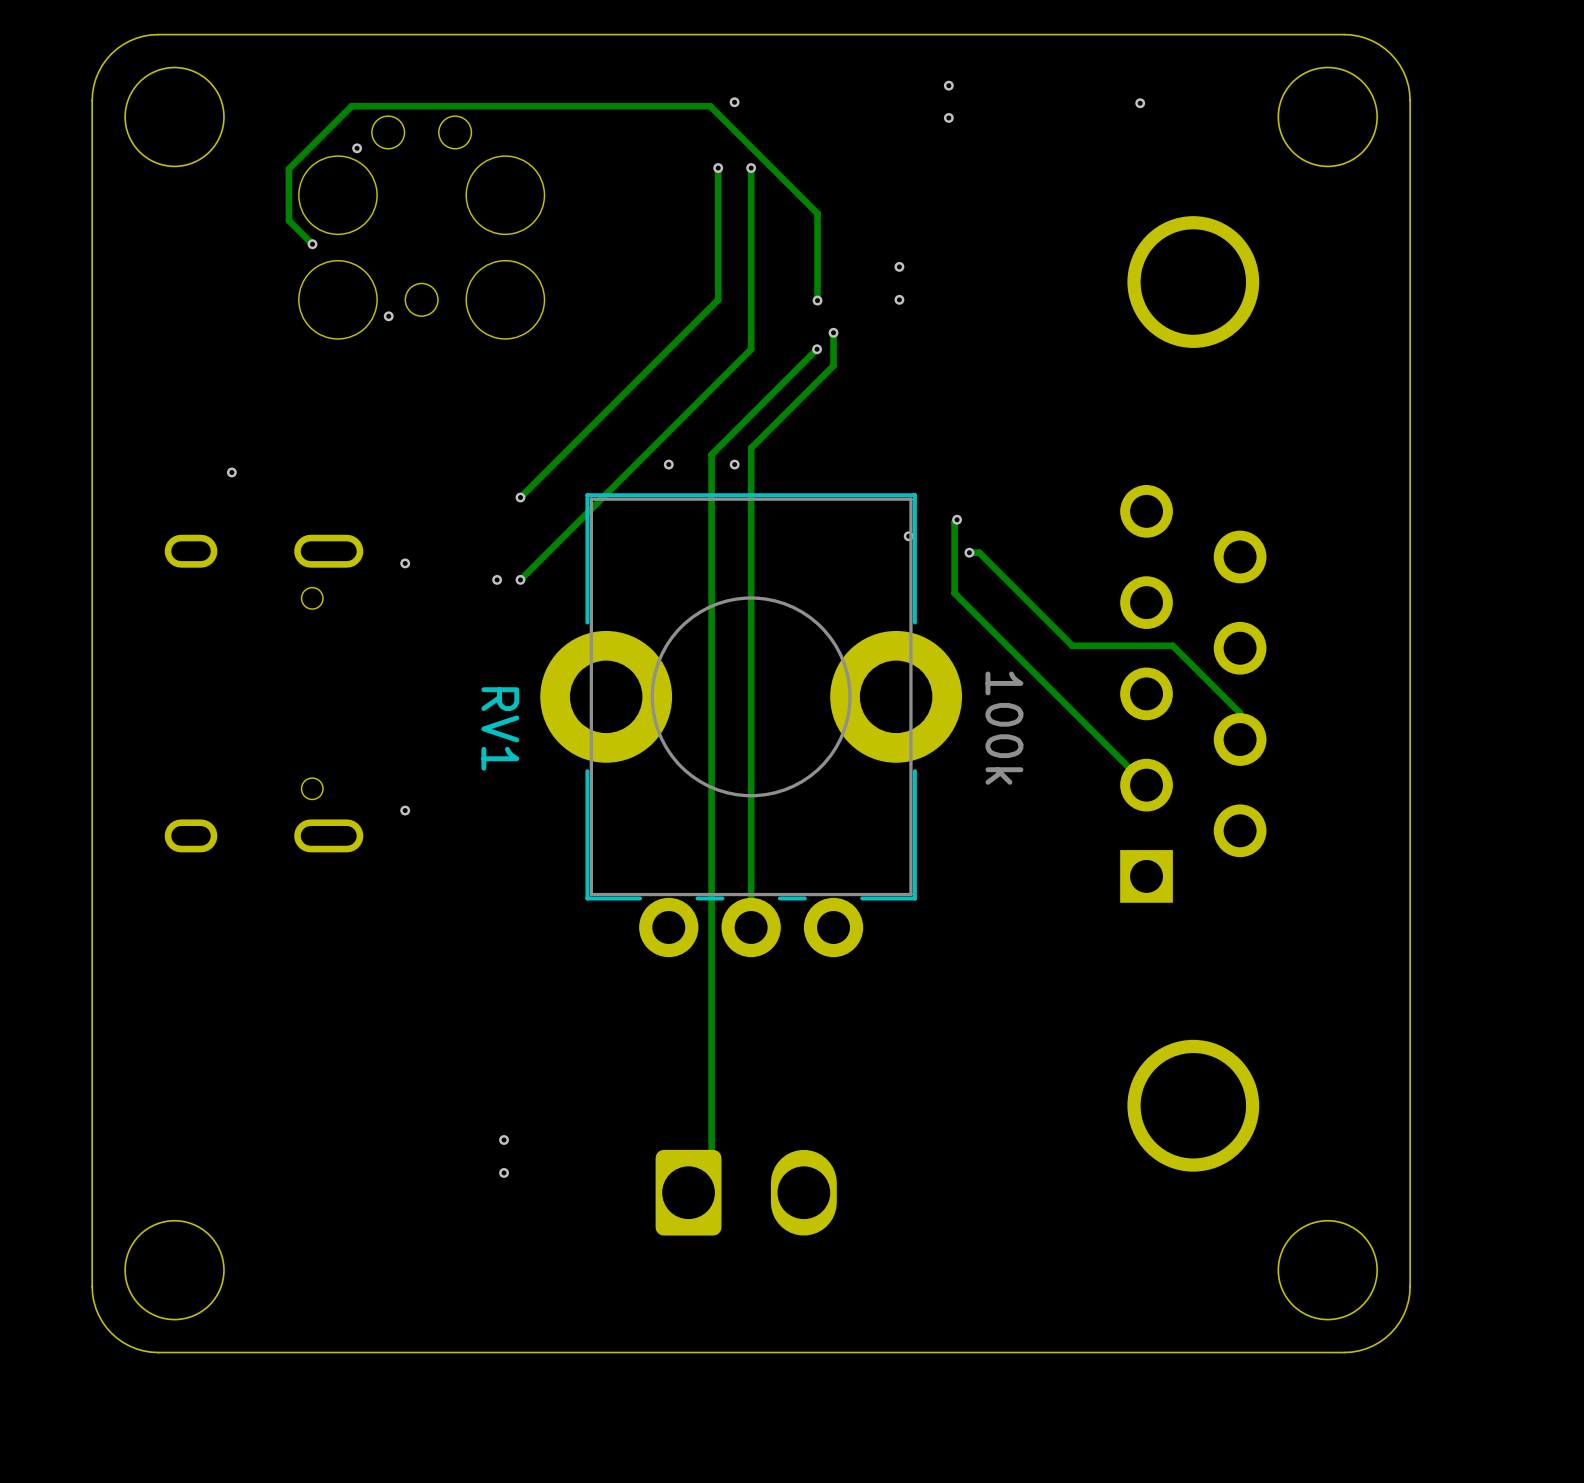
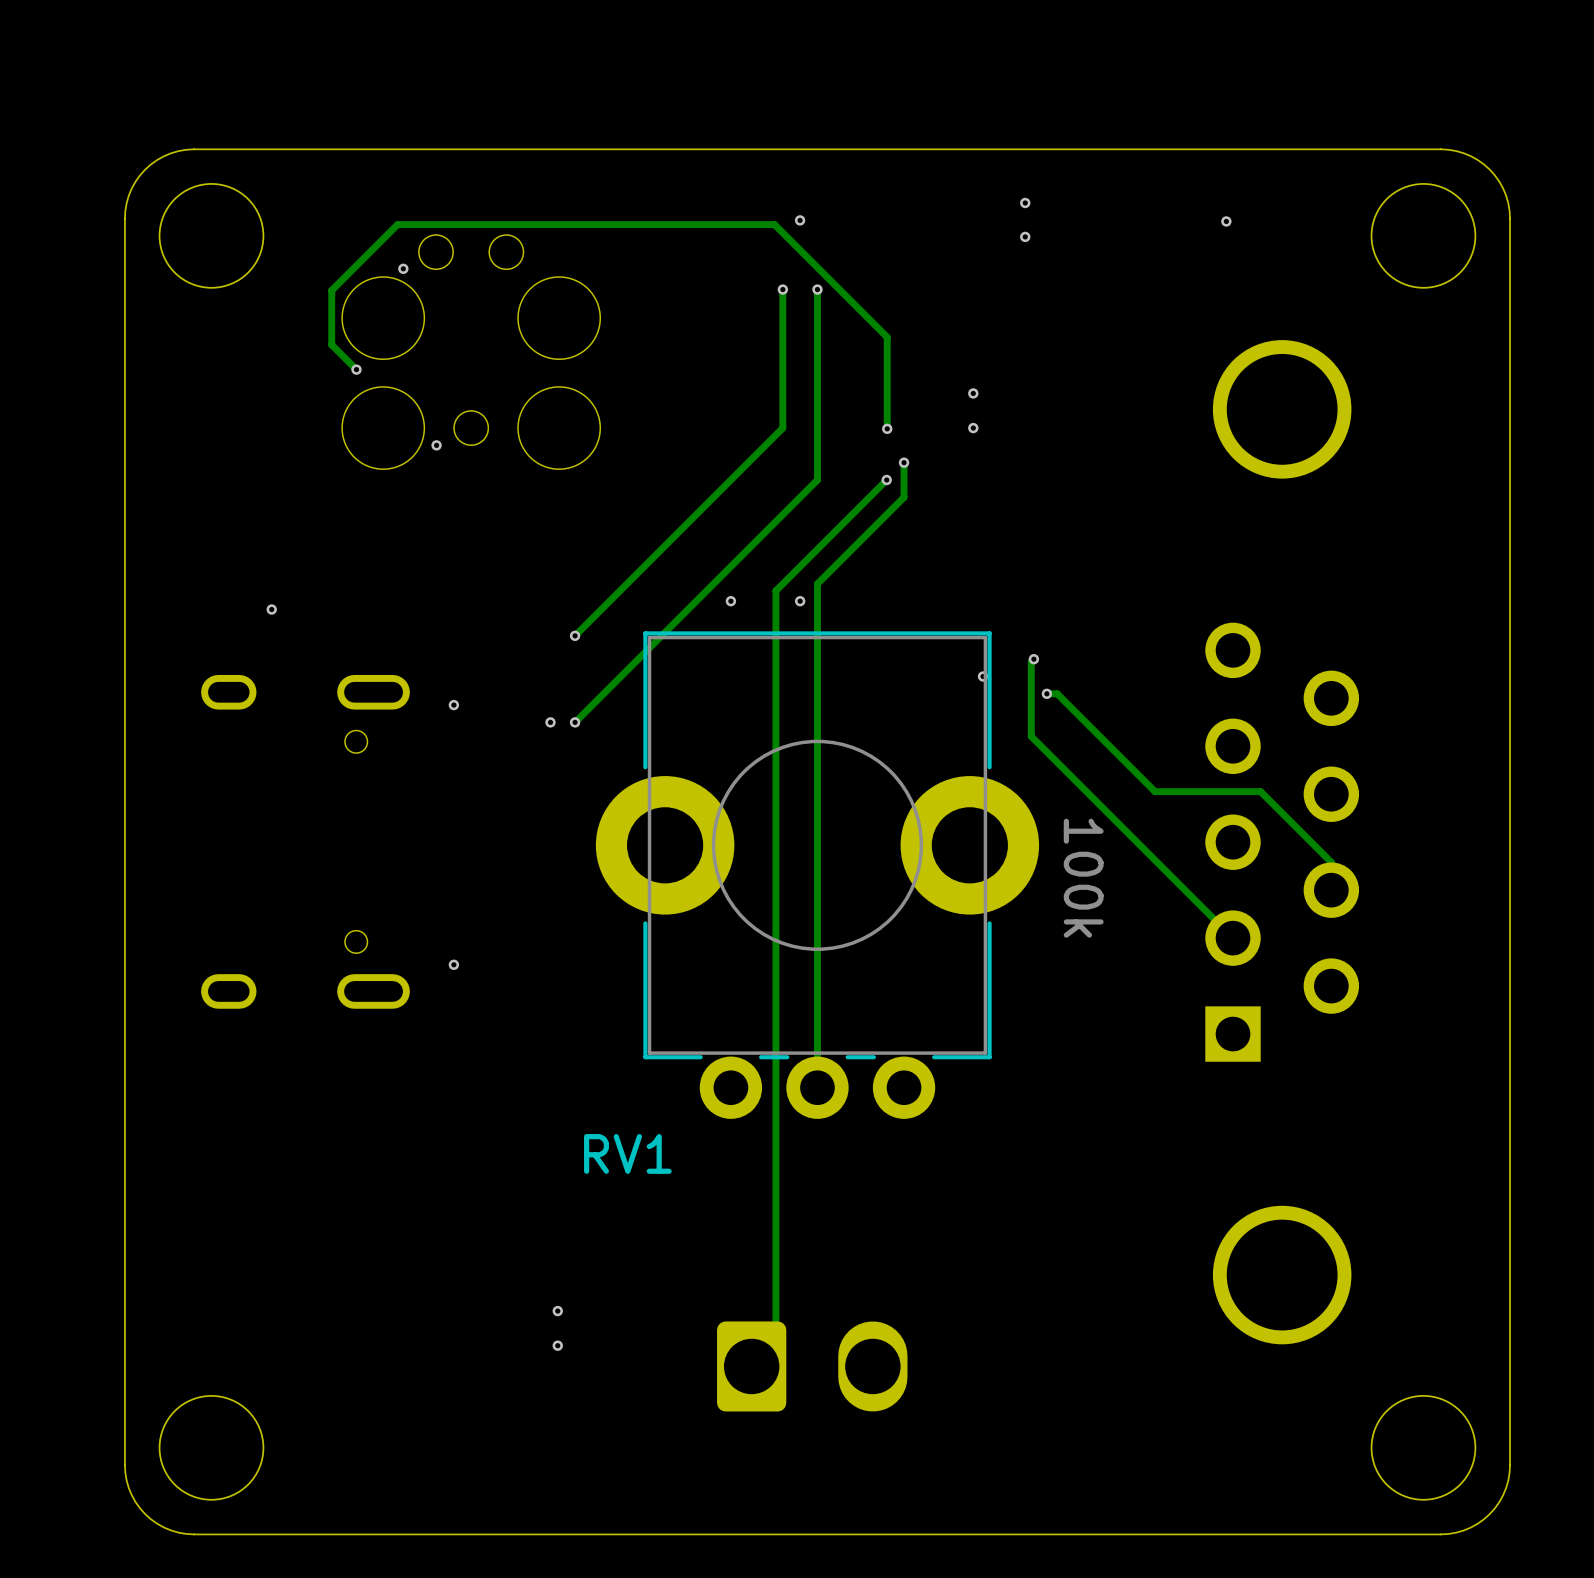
RV1 name rotation: 0° (500, 728) -> 90° counterclockwise (627, 1153)
RV1 name position: RV1 (500, 728) -> RV1 (627, 1153)

